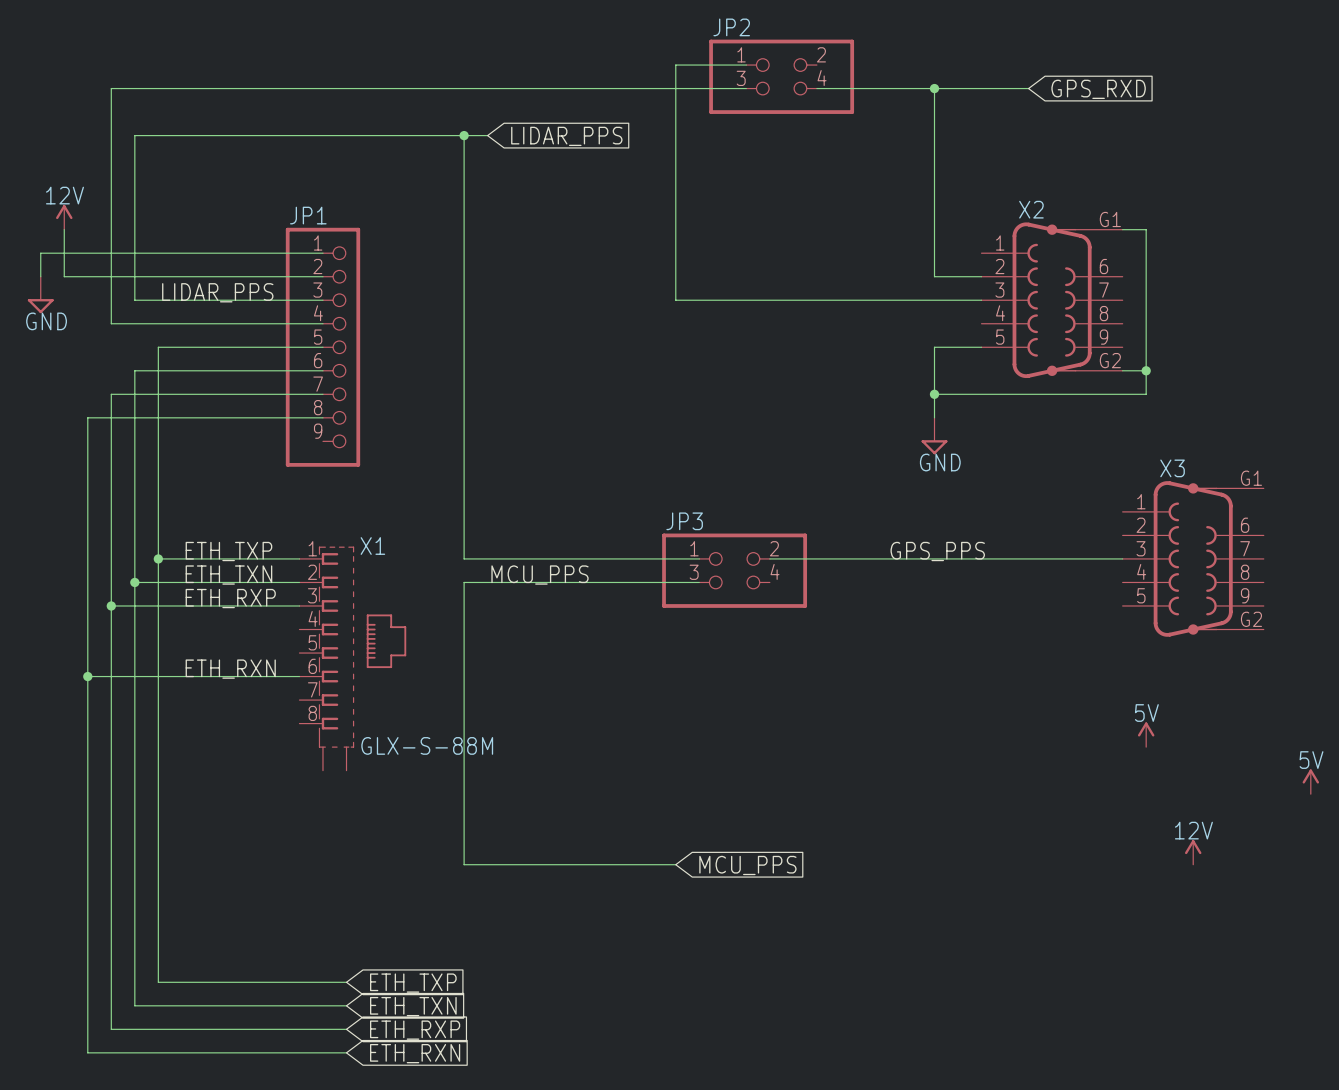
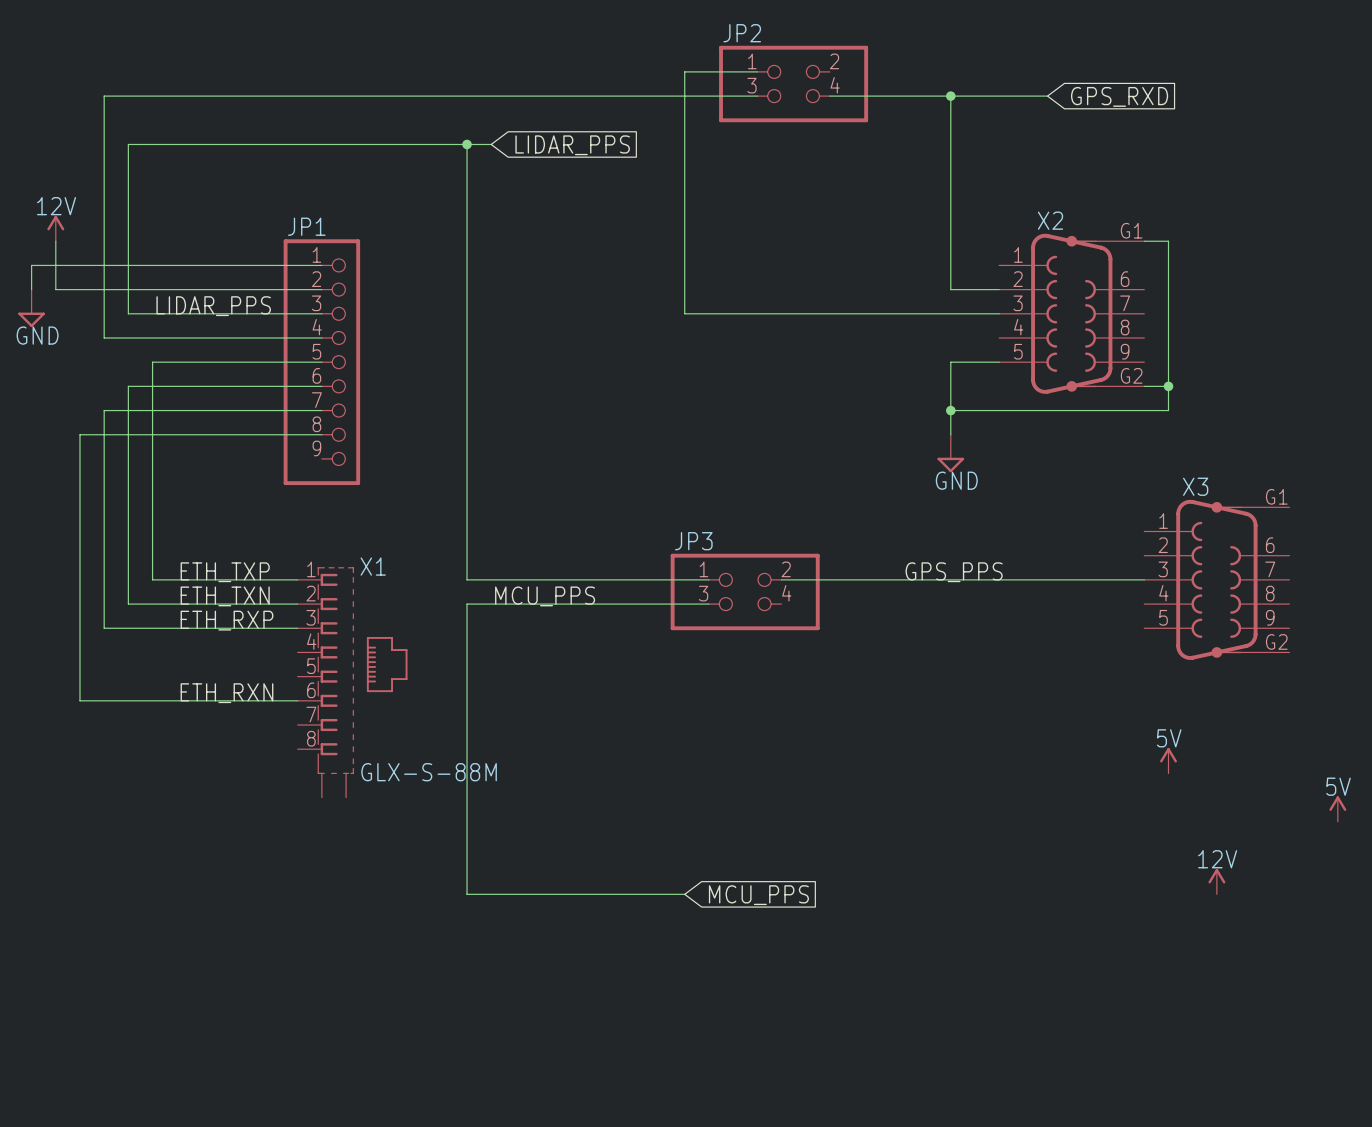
wire: (158, 558) (158, 982) (346, 982) -> none
junction: (158, 558) -> none
wire: (134, 582) (134, 1005) (346, 1005) -> none
junction: (134, 582) -> none
wire: (111, 605) (111, 1029) (346, 1029) -> none
junction: (111, 605) -> none
wire: (87, 676) (87, 1052) (346, 1052) -> none
junction: (87, 676) -> none
global label: ETH_TXP (413, 983) -> none
global label: ETH_TXN (413, 1006) -> none
global label: ETH_RXP (415, 1030) -> none
global label: ETH_RXN (415, 1053) -> none

